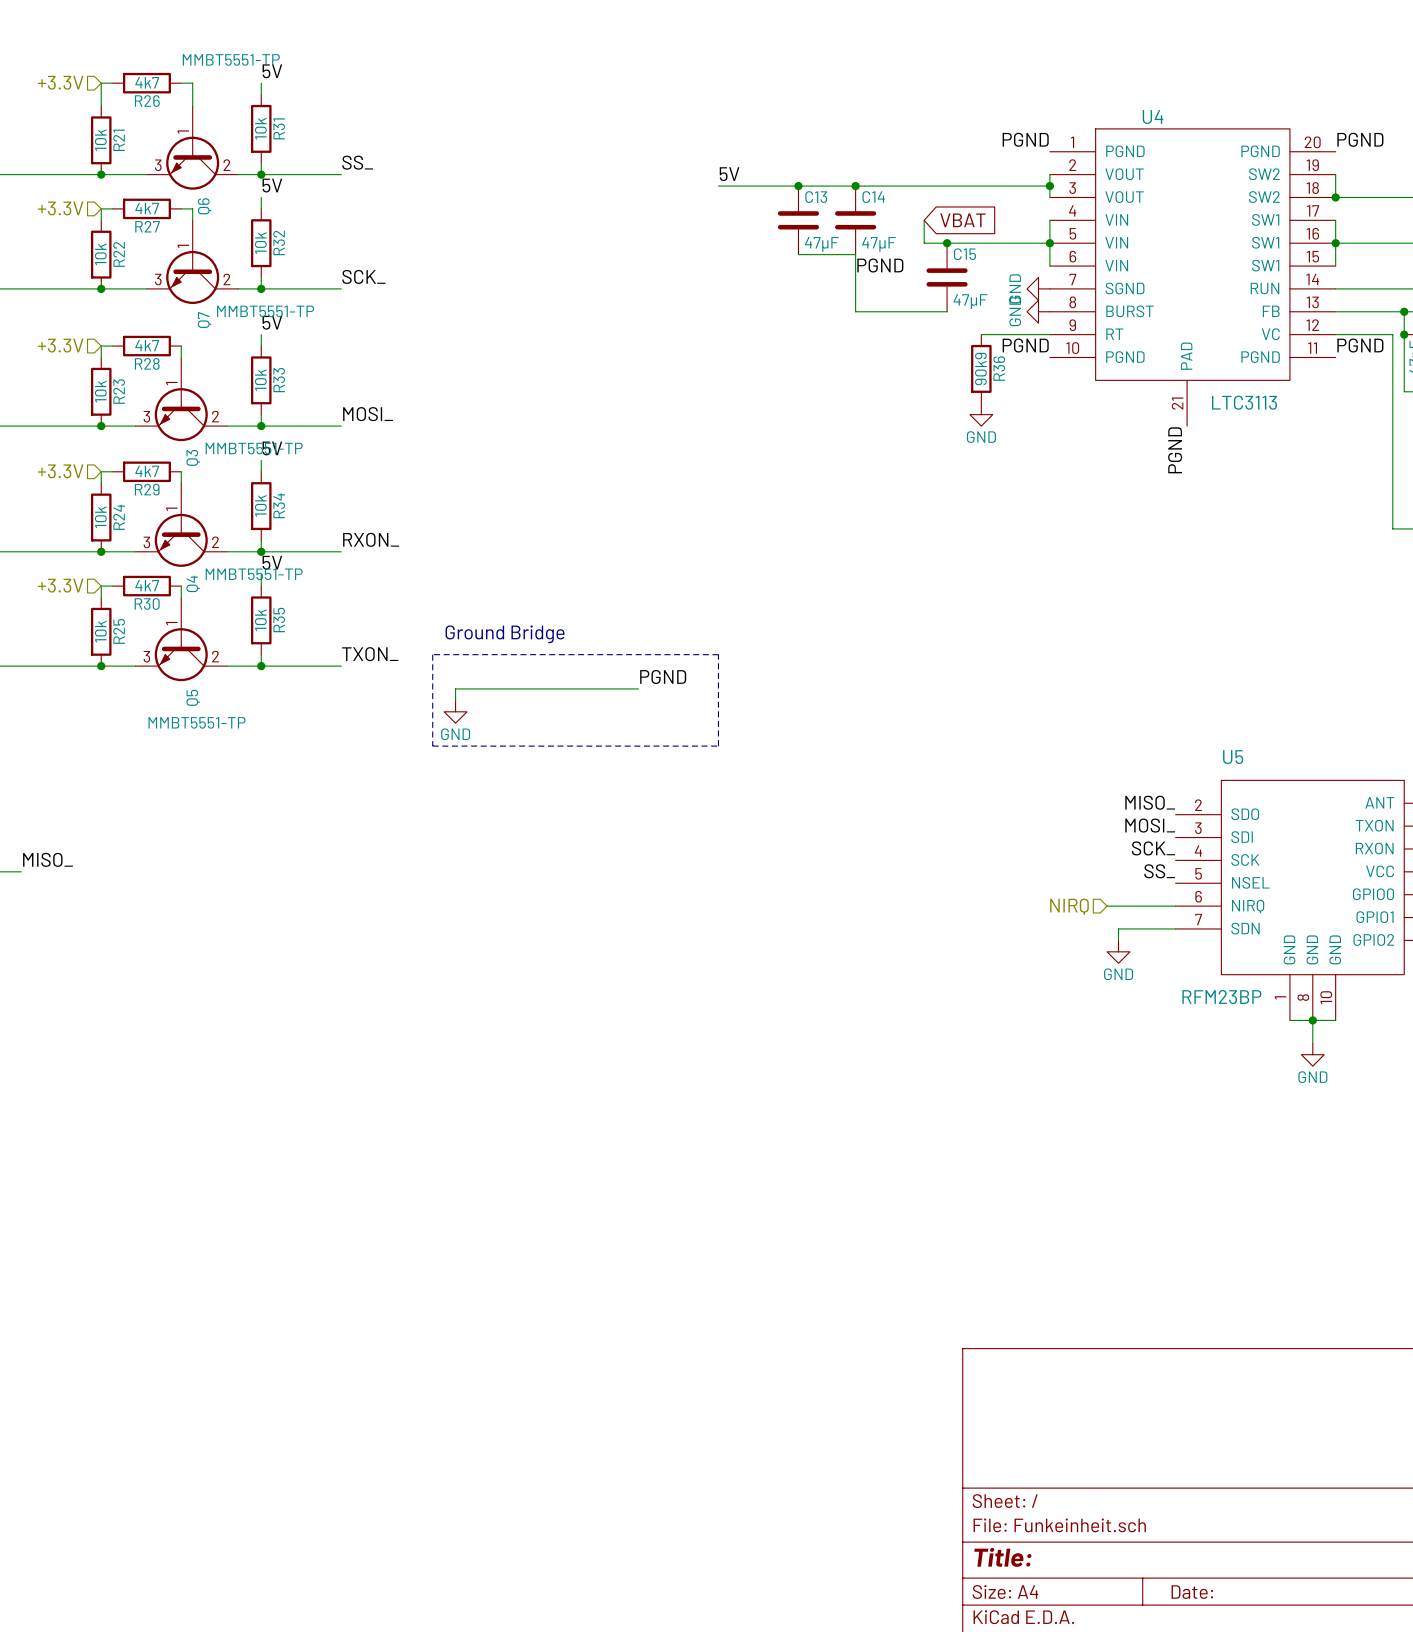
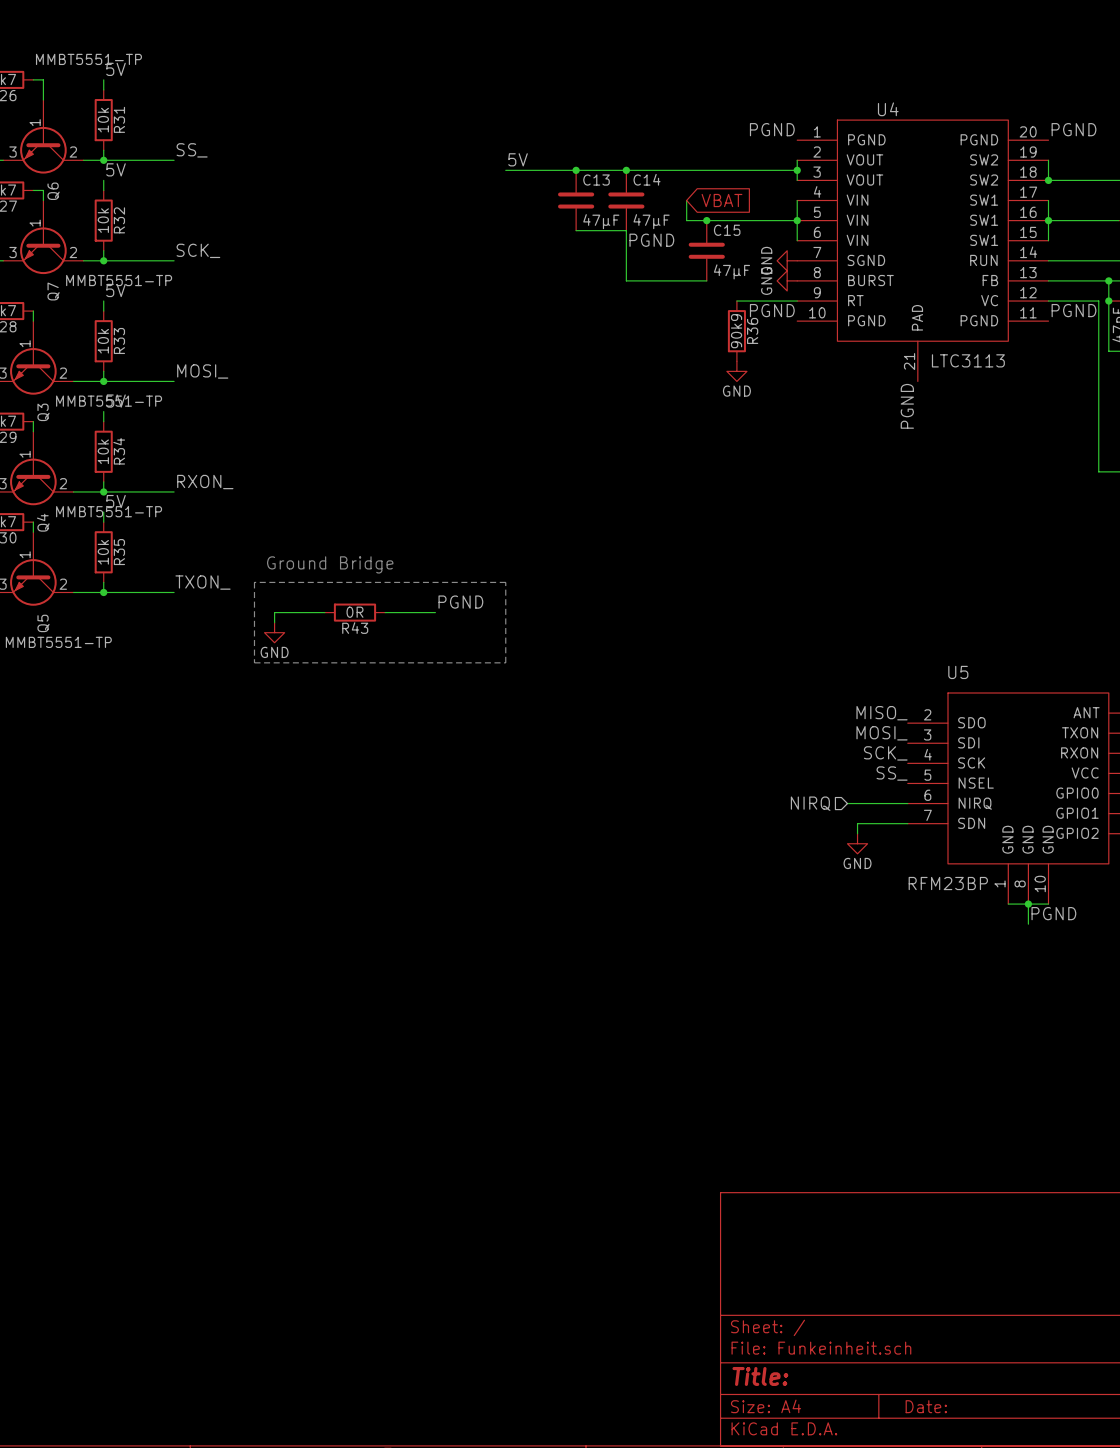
wire: (512, 688) (581, 688) -> none
R43: none -> 0R (354, 612)
label: none -> PGND (1053, 913)
power symbol: GND (1312, 1054) -> none

